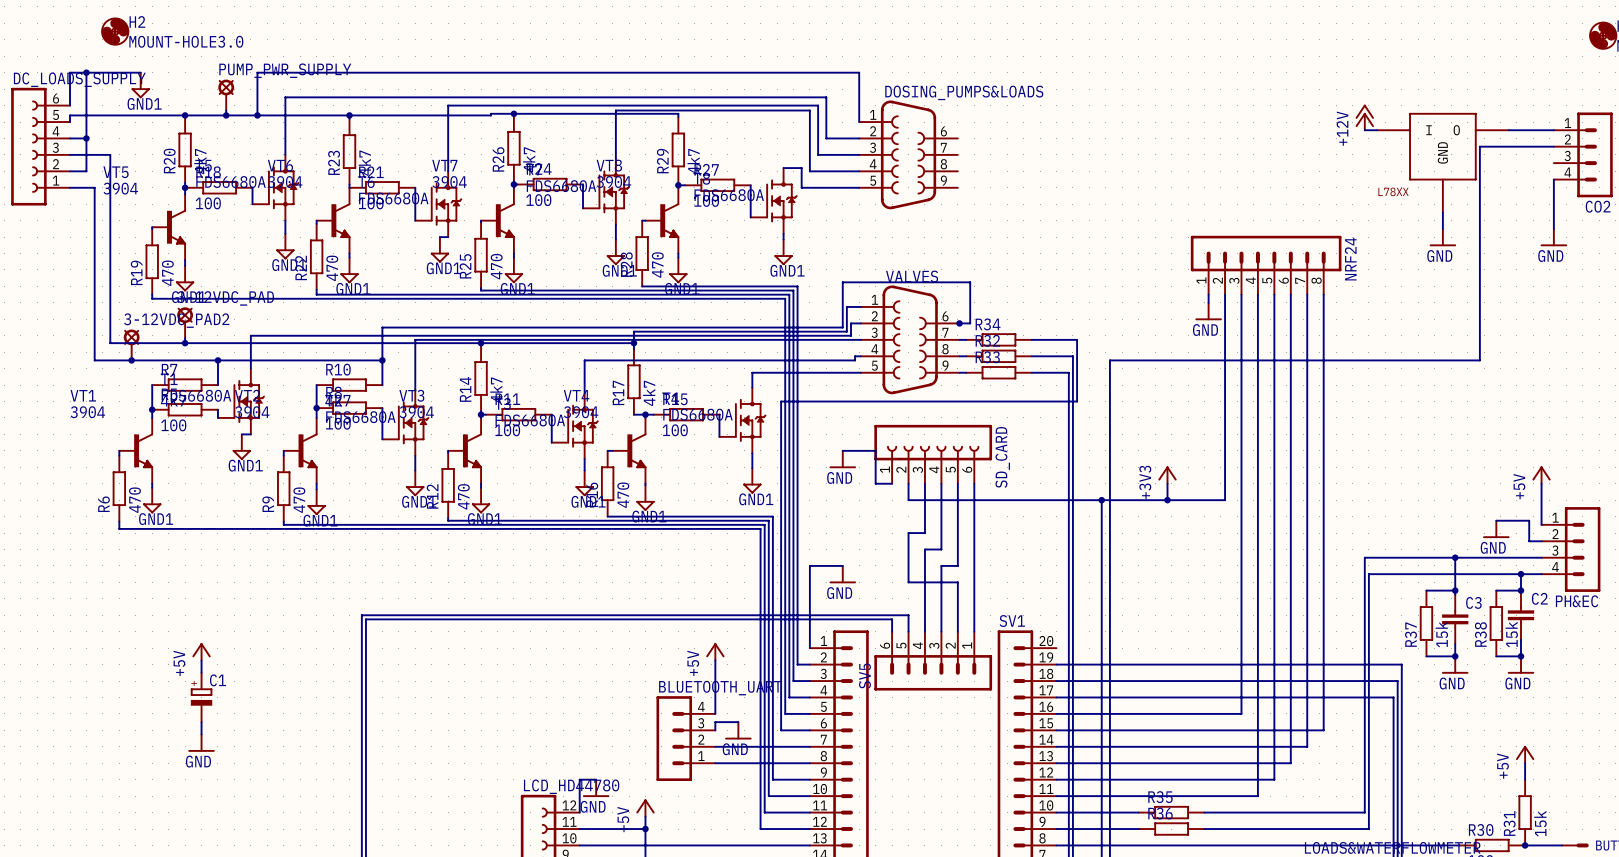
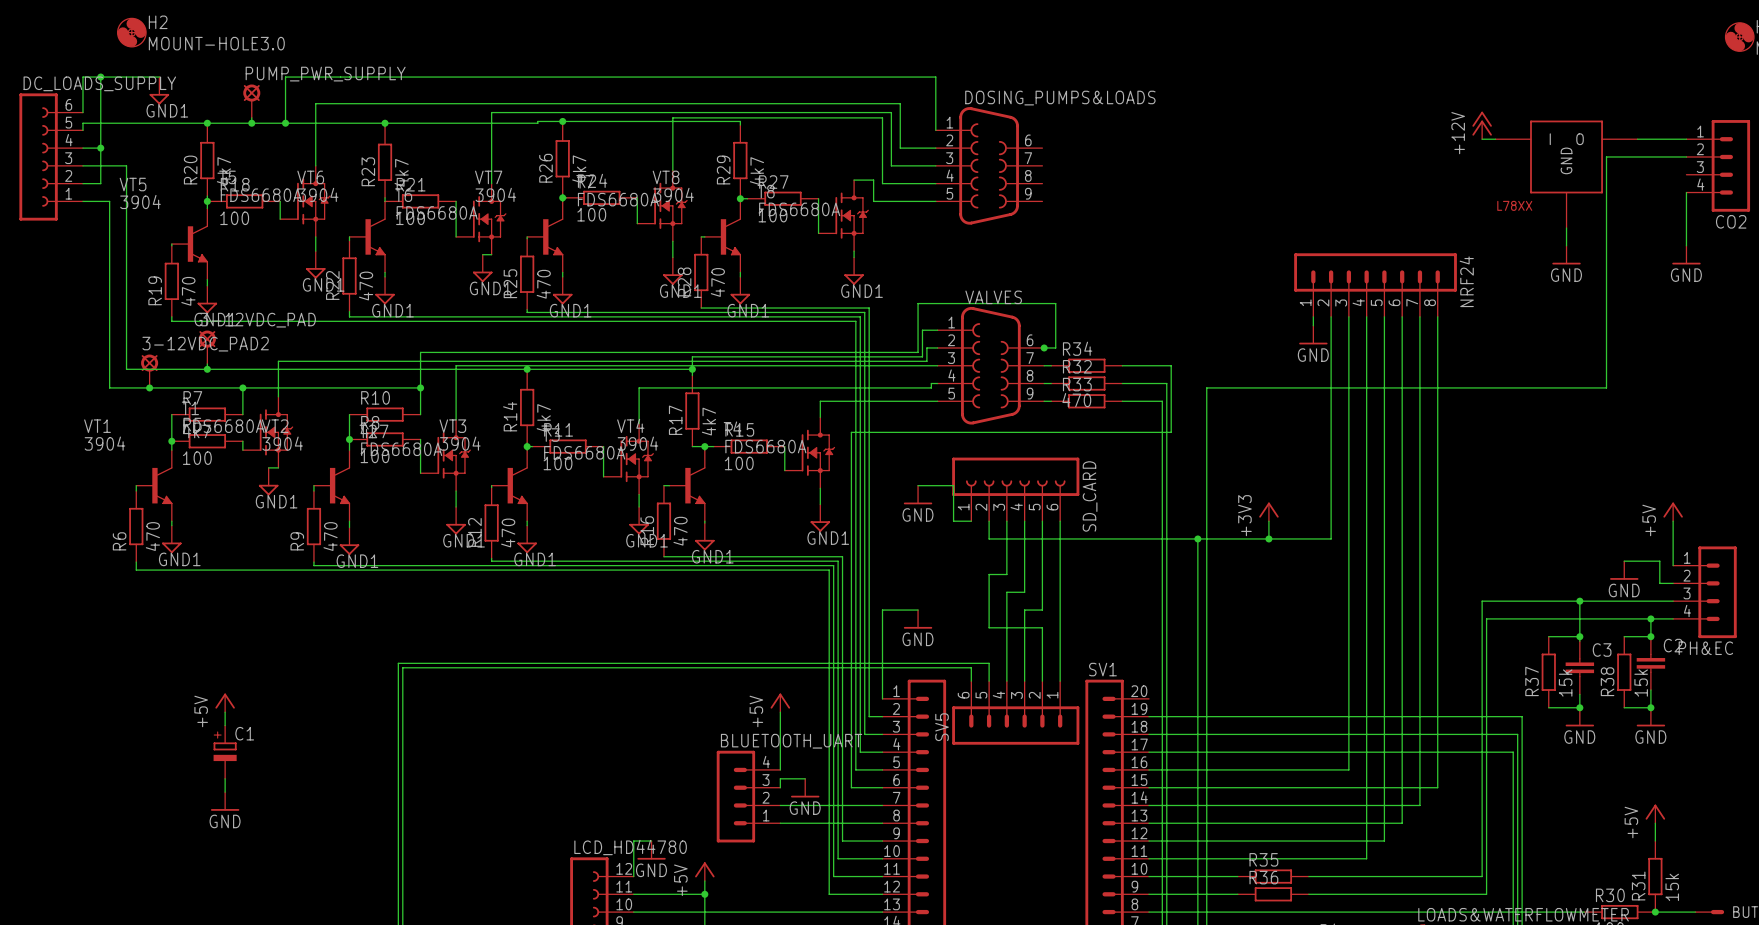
R32 value: none -> 470 (1076, 400)

